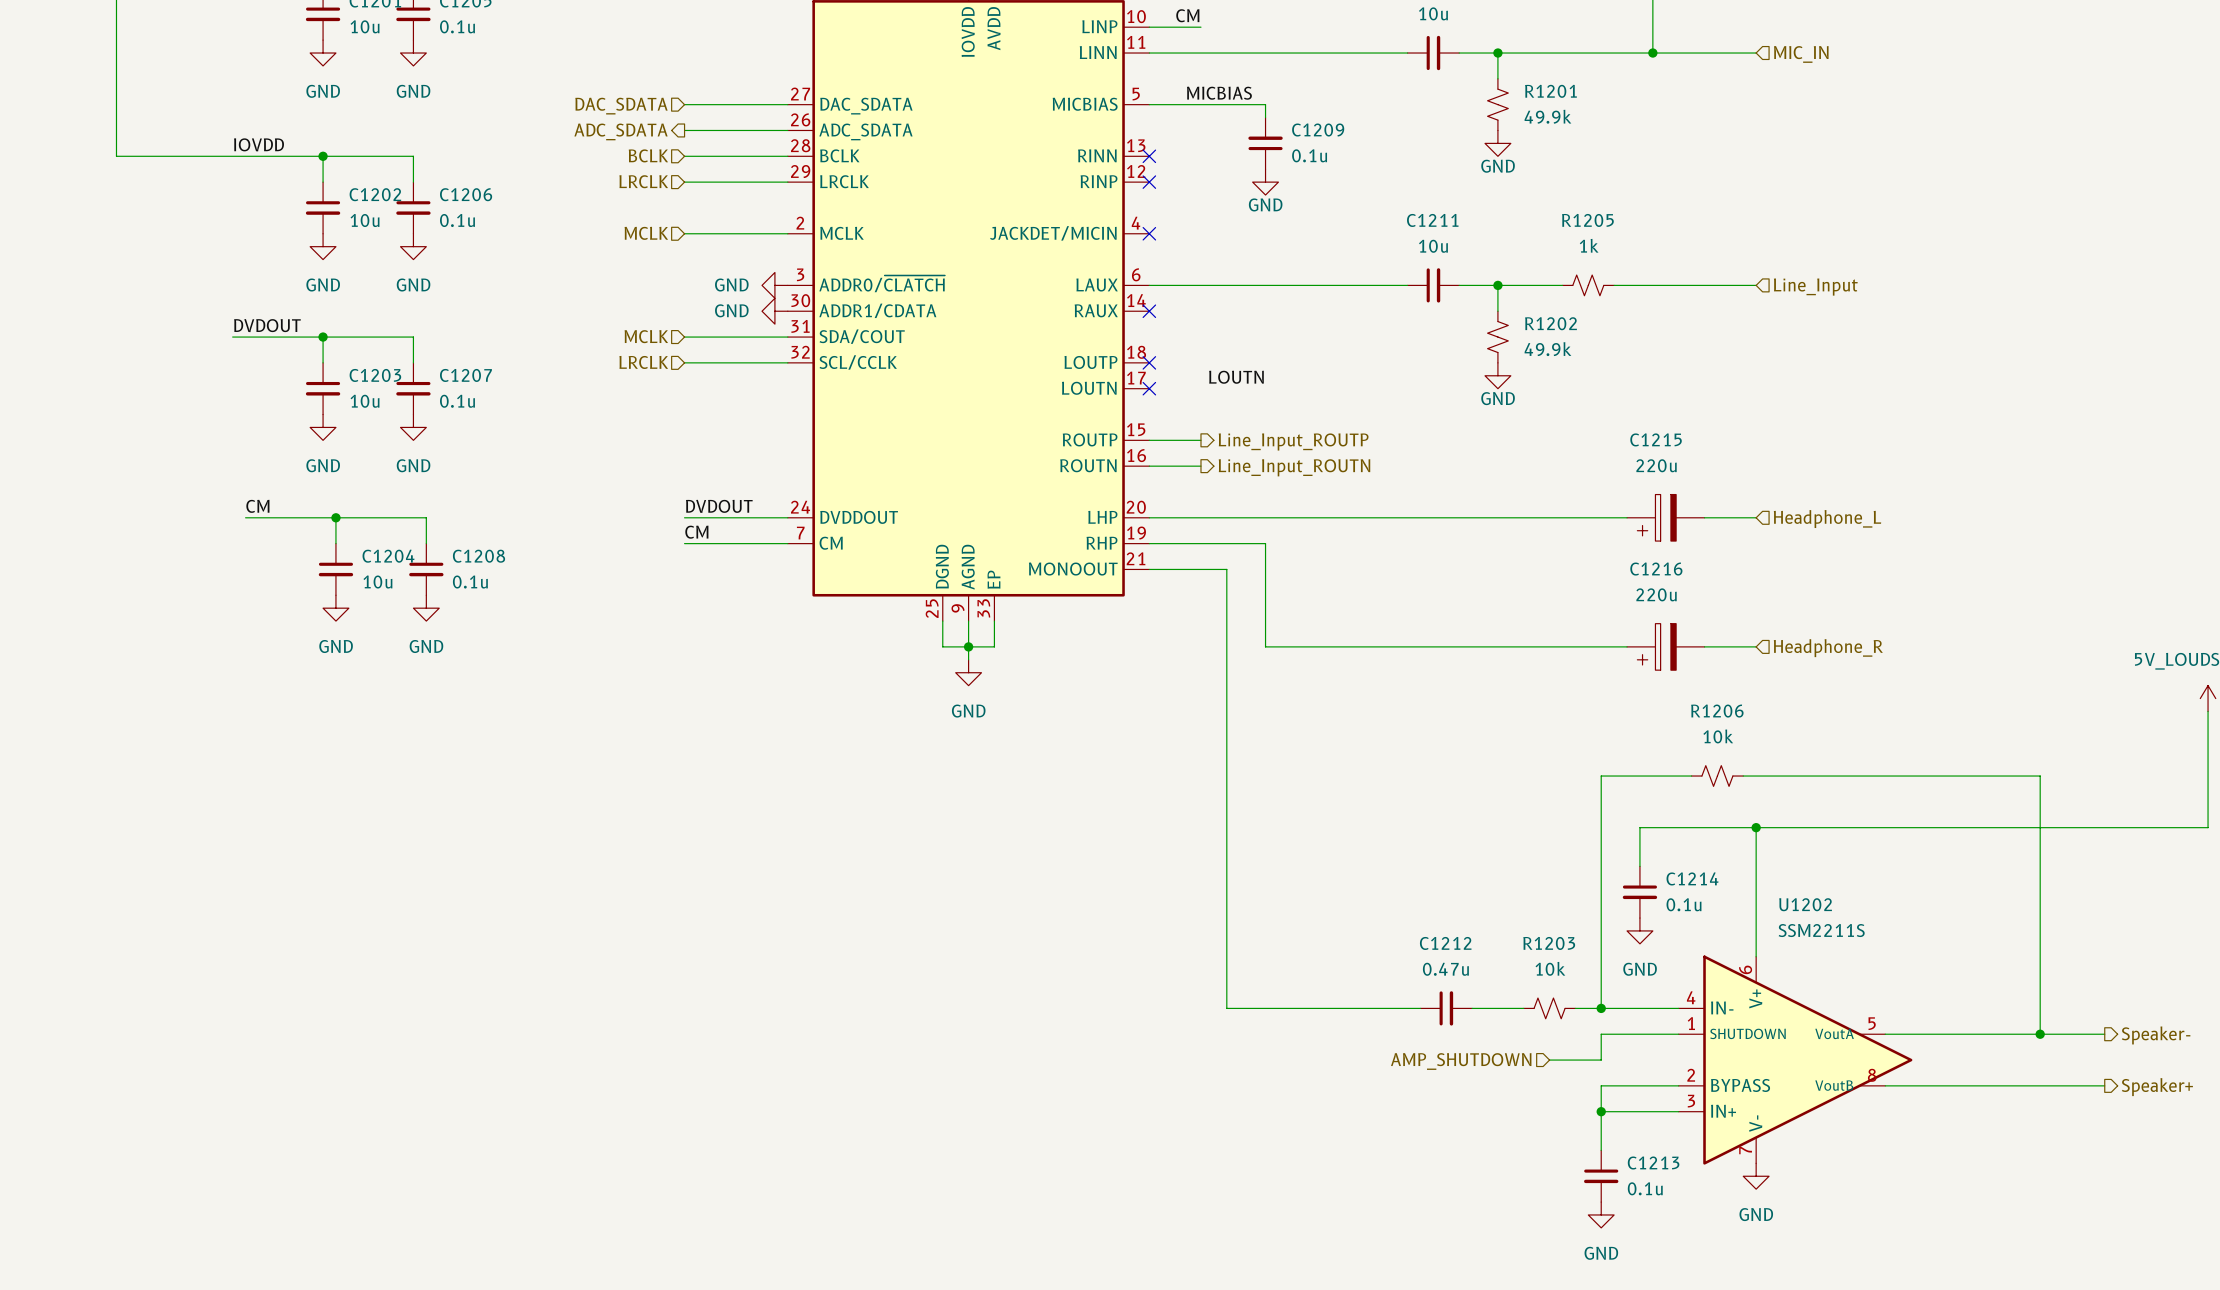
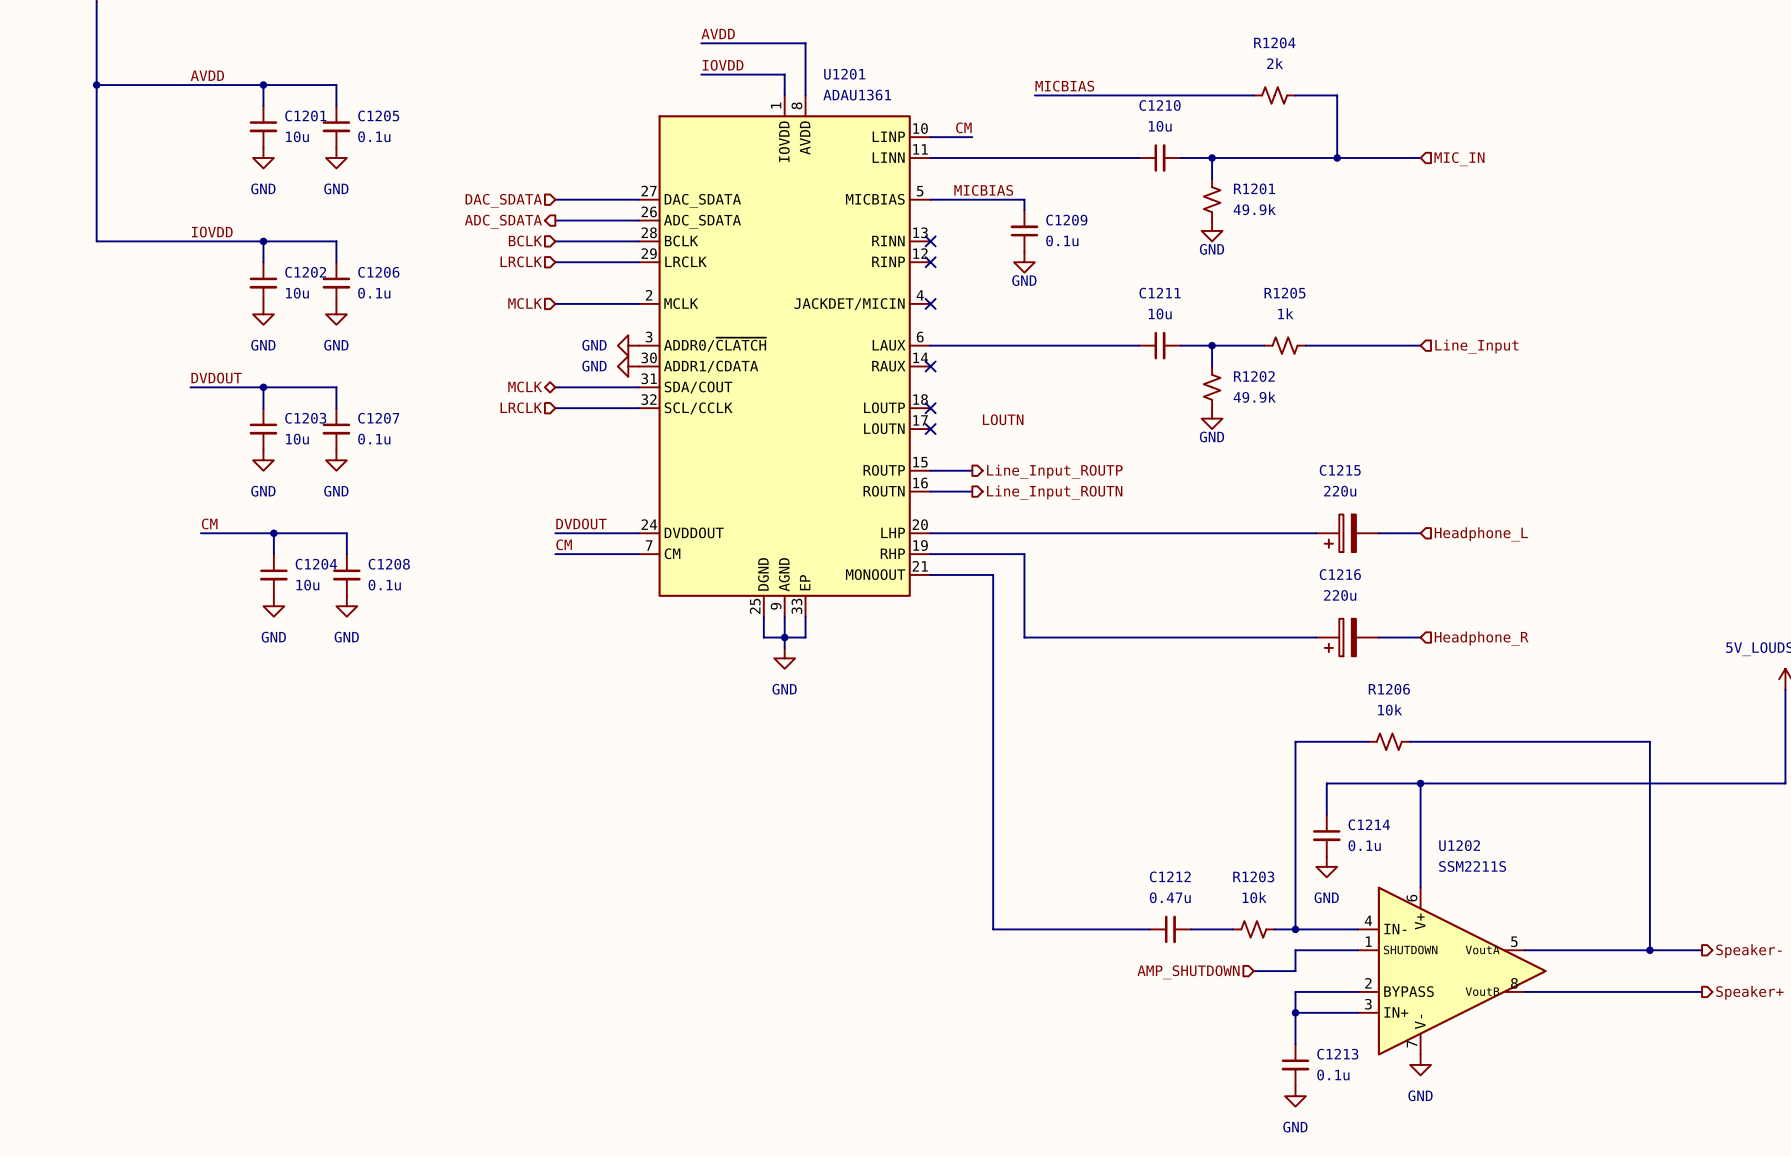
hierarchical label shape: input (646, 336) -> bidirectional (525, 386)

